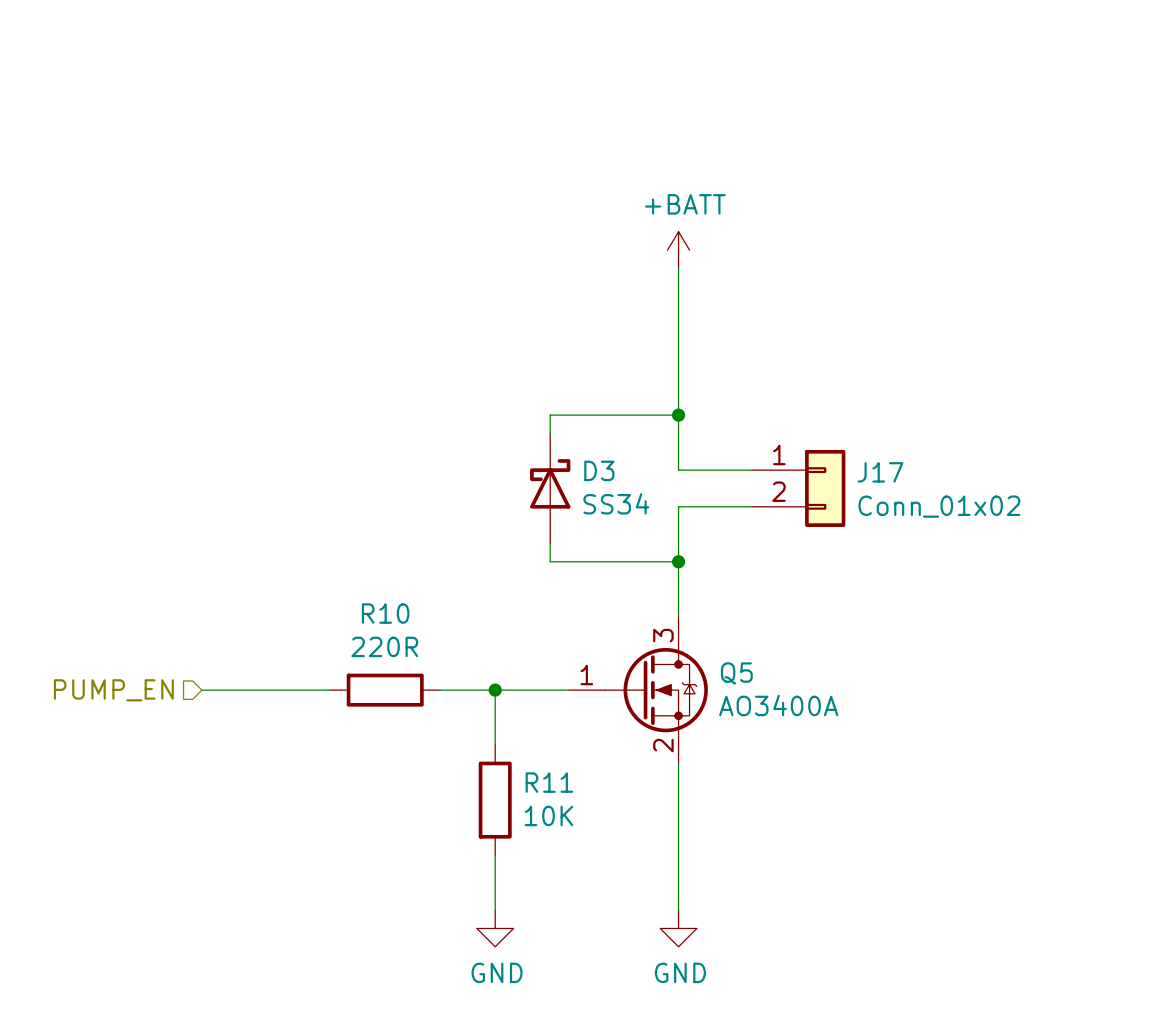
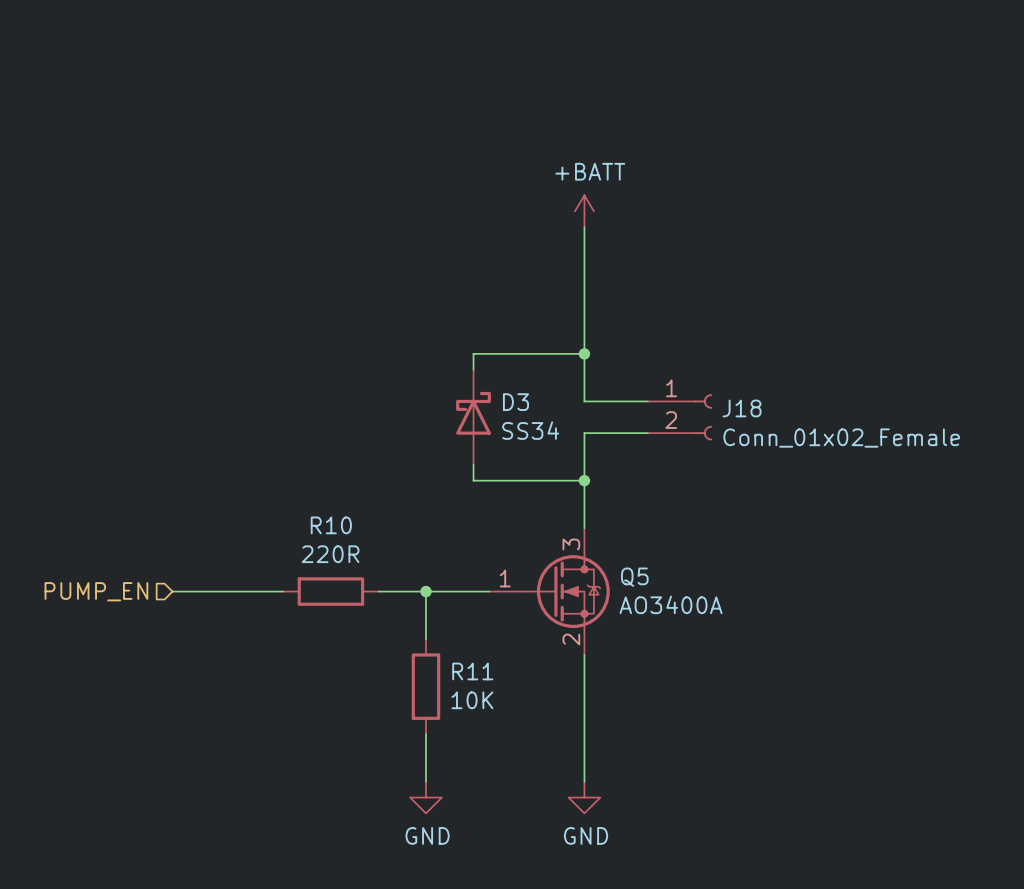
J18: none -> Conn_01x02_Female (679, 417)
J17: Conn_01x02 (798, 488) -> none

